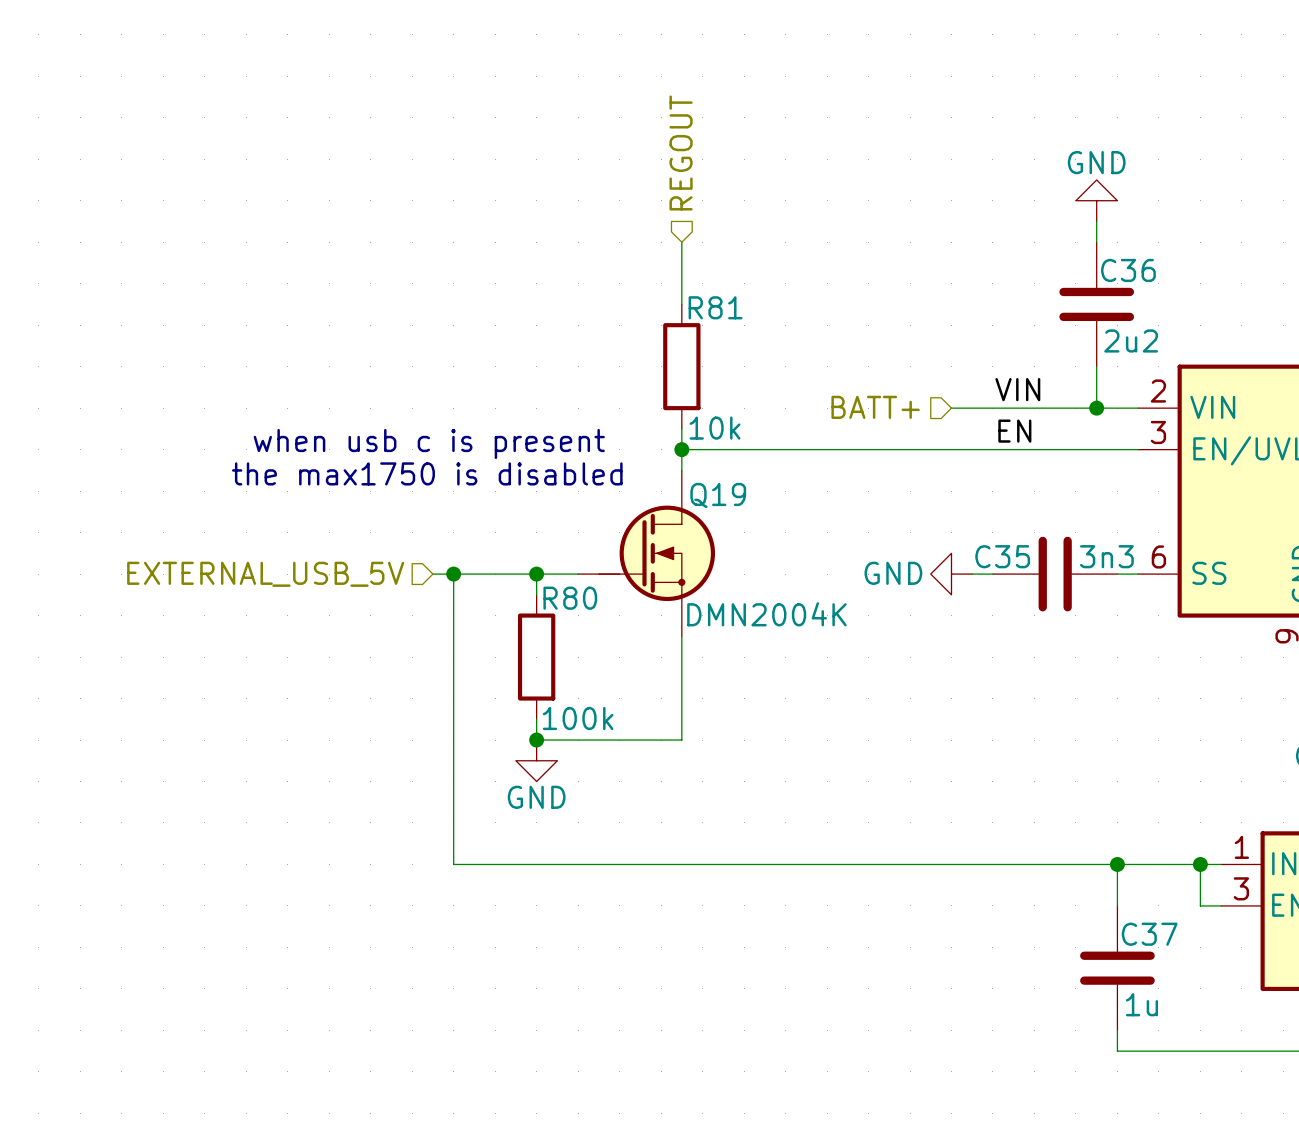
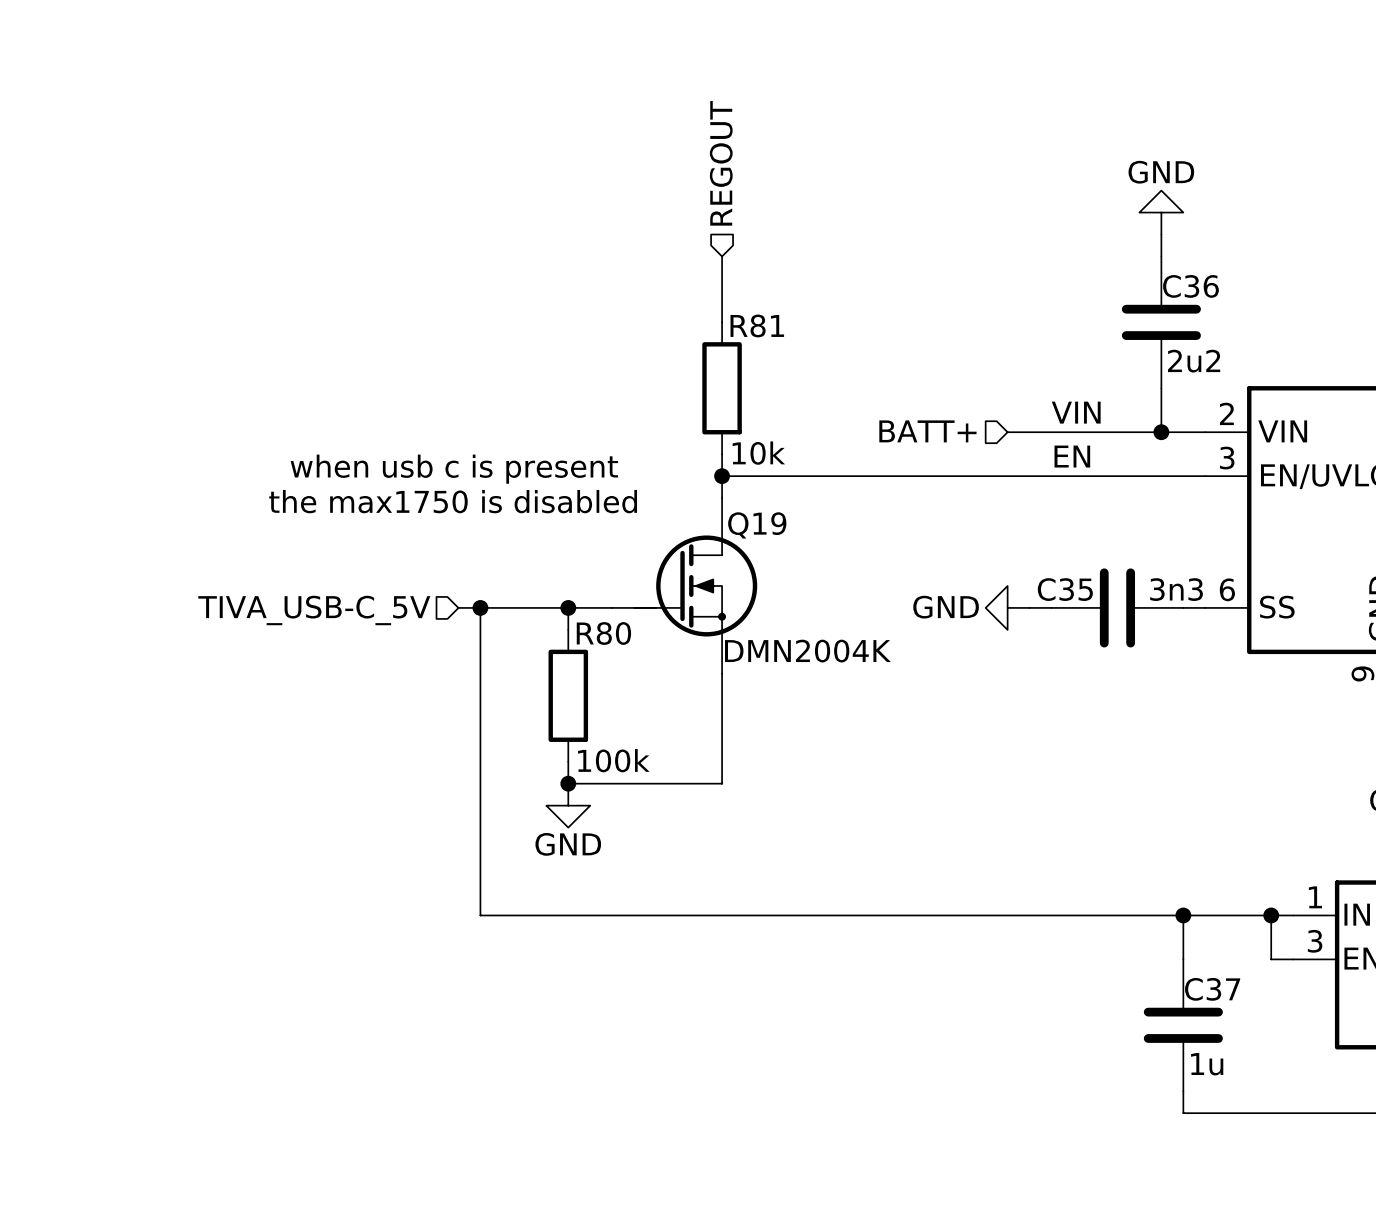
hierarchical label: EXTERNAL_USB_5V (265, 574) -> TIVA_USB-C_5V (314, 610)

